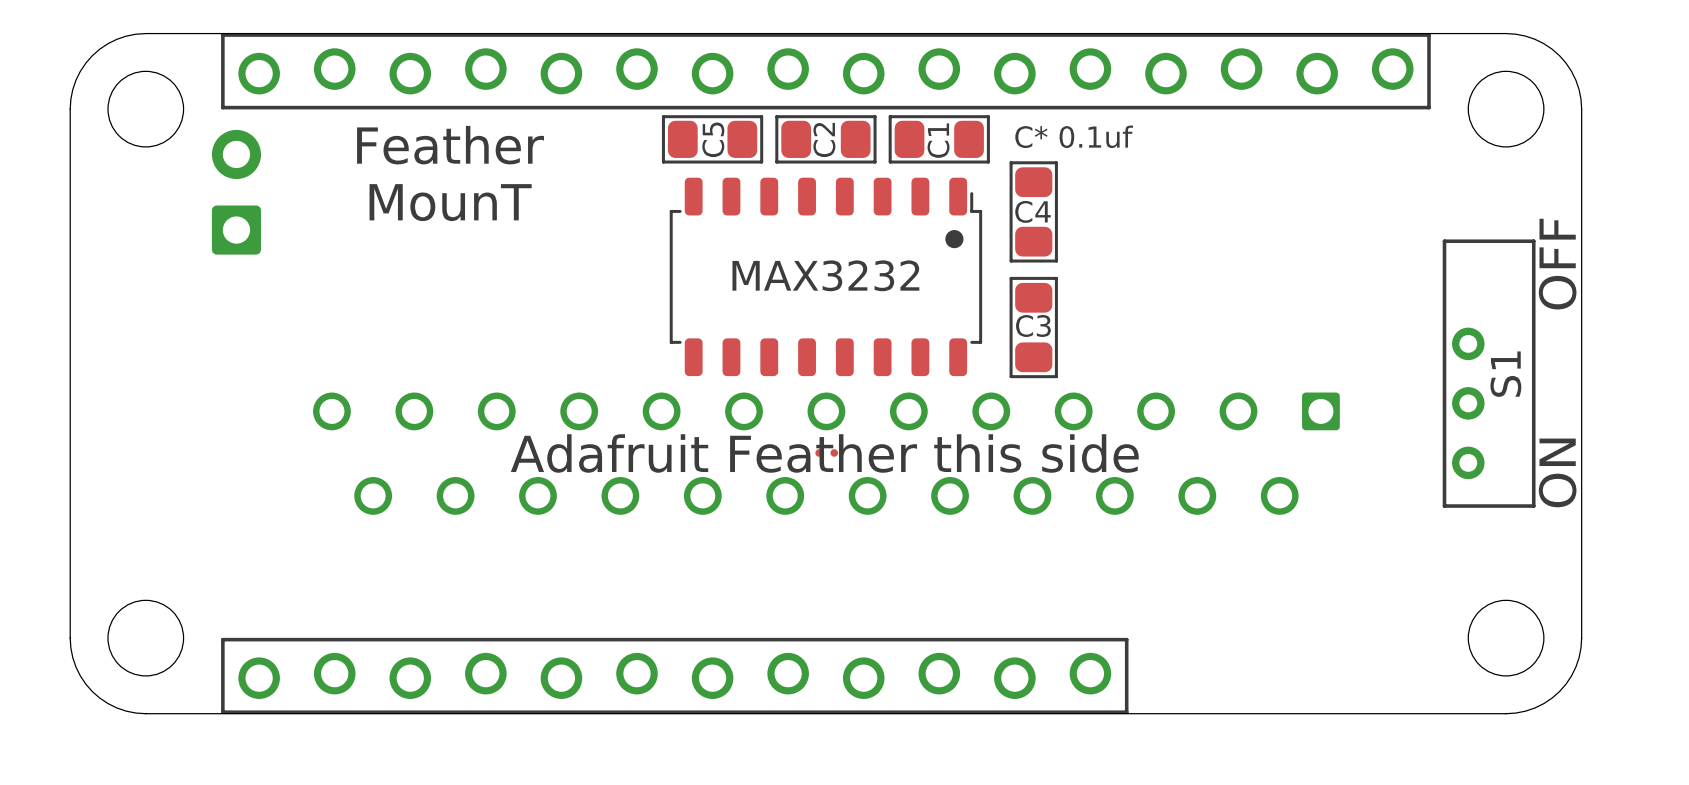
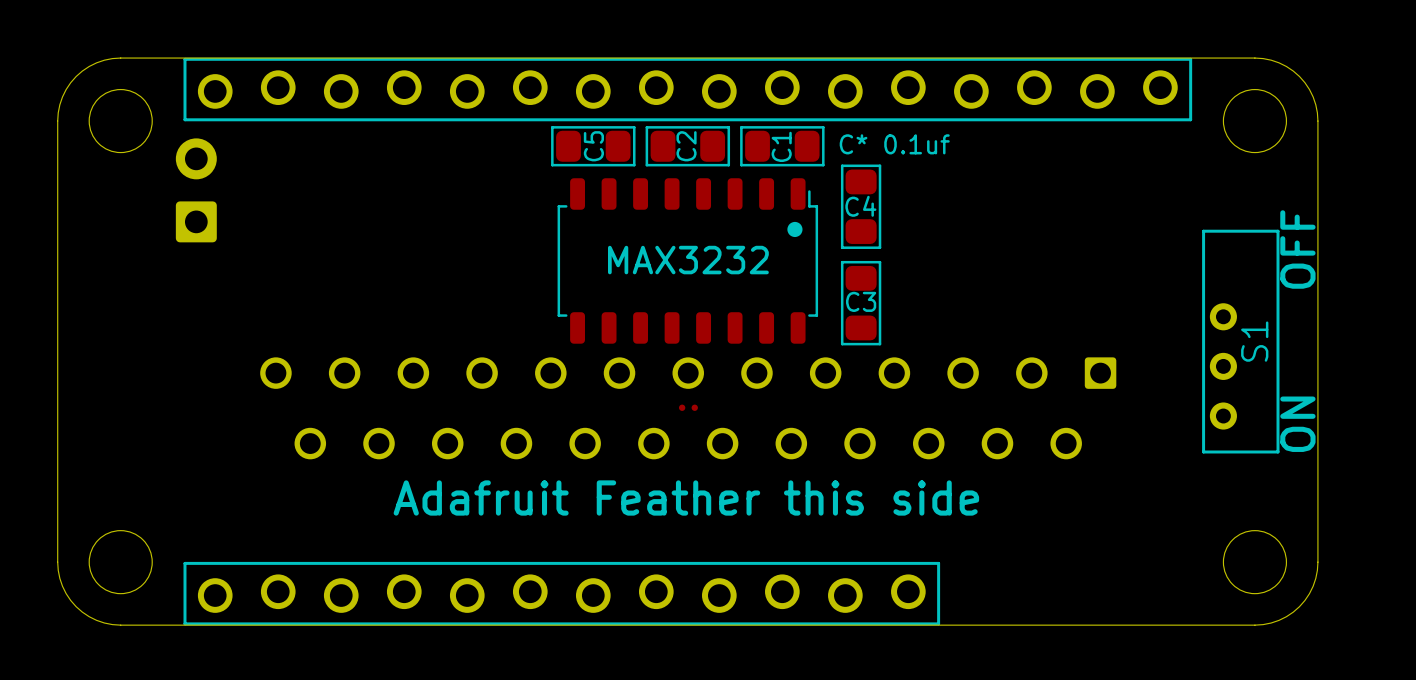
text: Feather (450, 145) -> none
text: MounT (450, 202) -> none
text position: Adafruit Feather this side (824, 453) -> Adafruit Feather this side (686, 497)

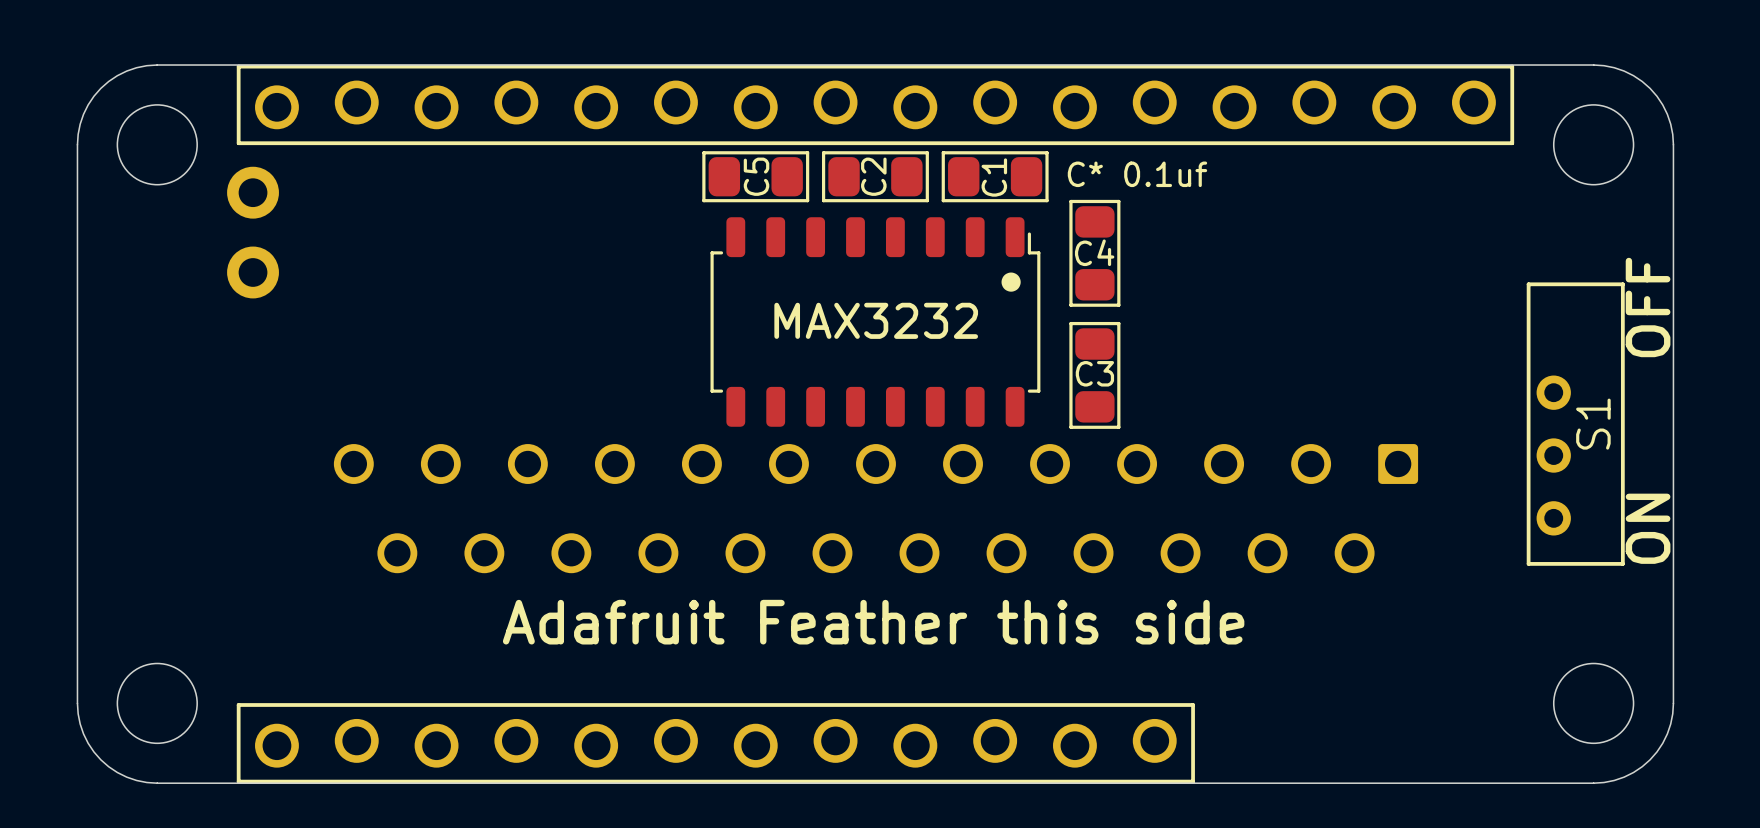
part footprint: [175, 138, 217, 243] -> [227, 166, 279, 299]
part: (688, 407) -> none

